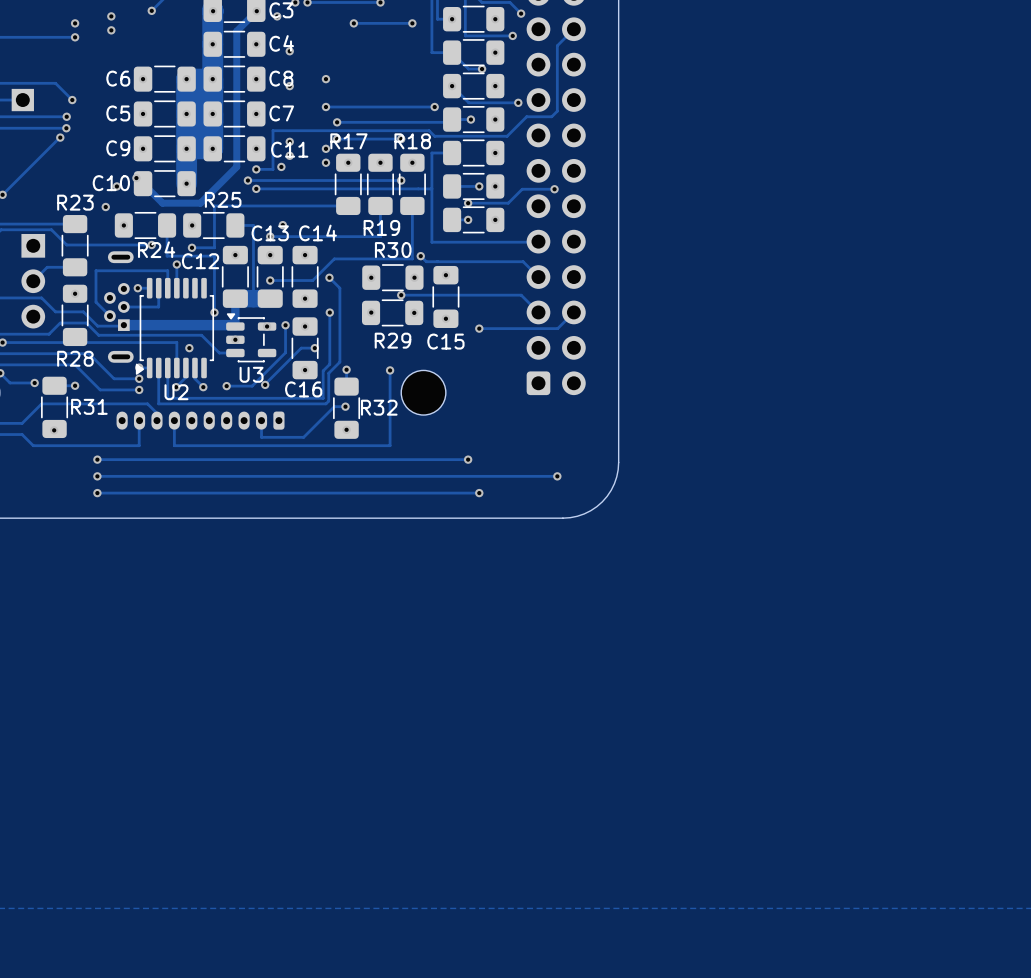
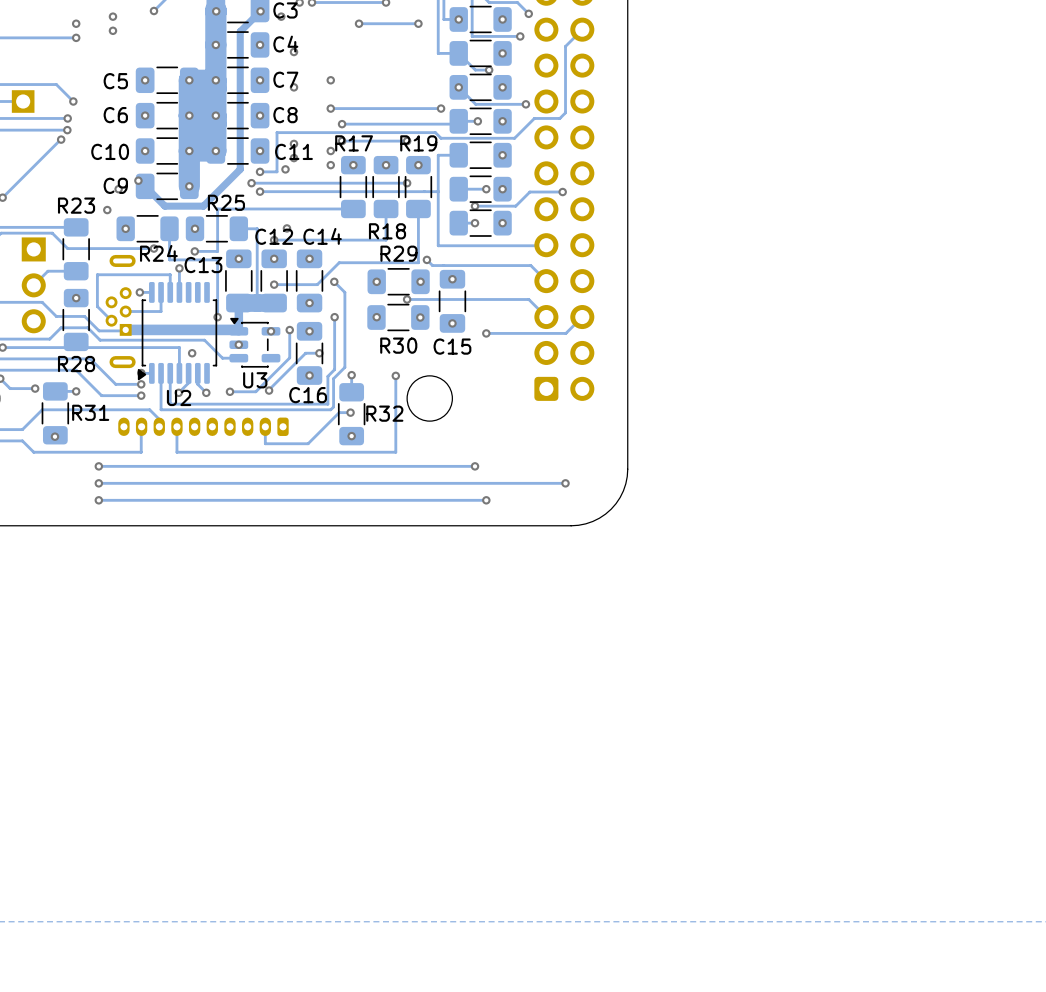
C6 name: C6 (118, 78) -> C5 (115, 81)
C8 name: C8 (281, 78) -> C7 (285, 79)
C5 name: C5 (118, 113) -> C6 (115, 115)
C7 name: C7 (281, 113) -> C8 (285, 115)
R18 name: R18 (412, 141) -> R19 (418, 143)
C9 name: C9 (118, 148) -> C10 (110, 151)
C10 name: C10 (111, 183) -> C9 (115, 185)
R19 name: R19 (381, 227) -> R18 (387, 231)
C13 name: C13 (270, 233) -> C12 (274, 236)
R30 name: R30 (393, 250) -> R29 (398, 253)
C12 name: C12 (200, 261) -> C13 (203, 265)
R29 name: R29 (393, 340) -> R30 (398, 345)

